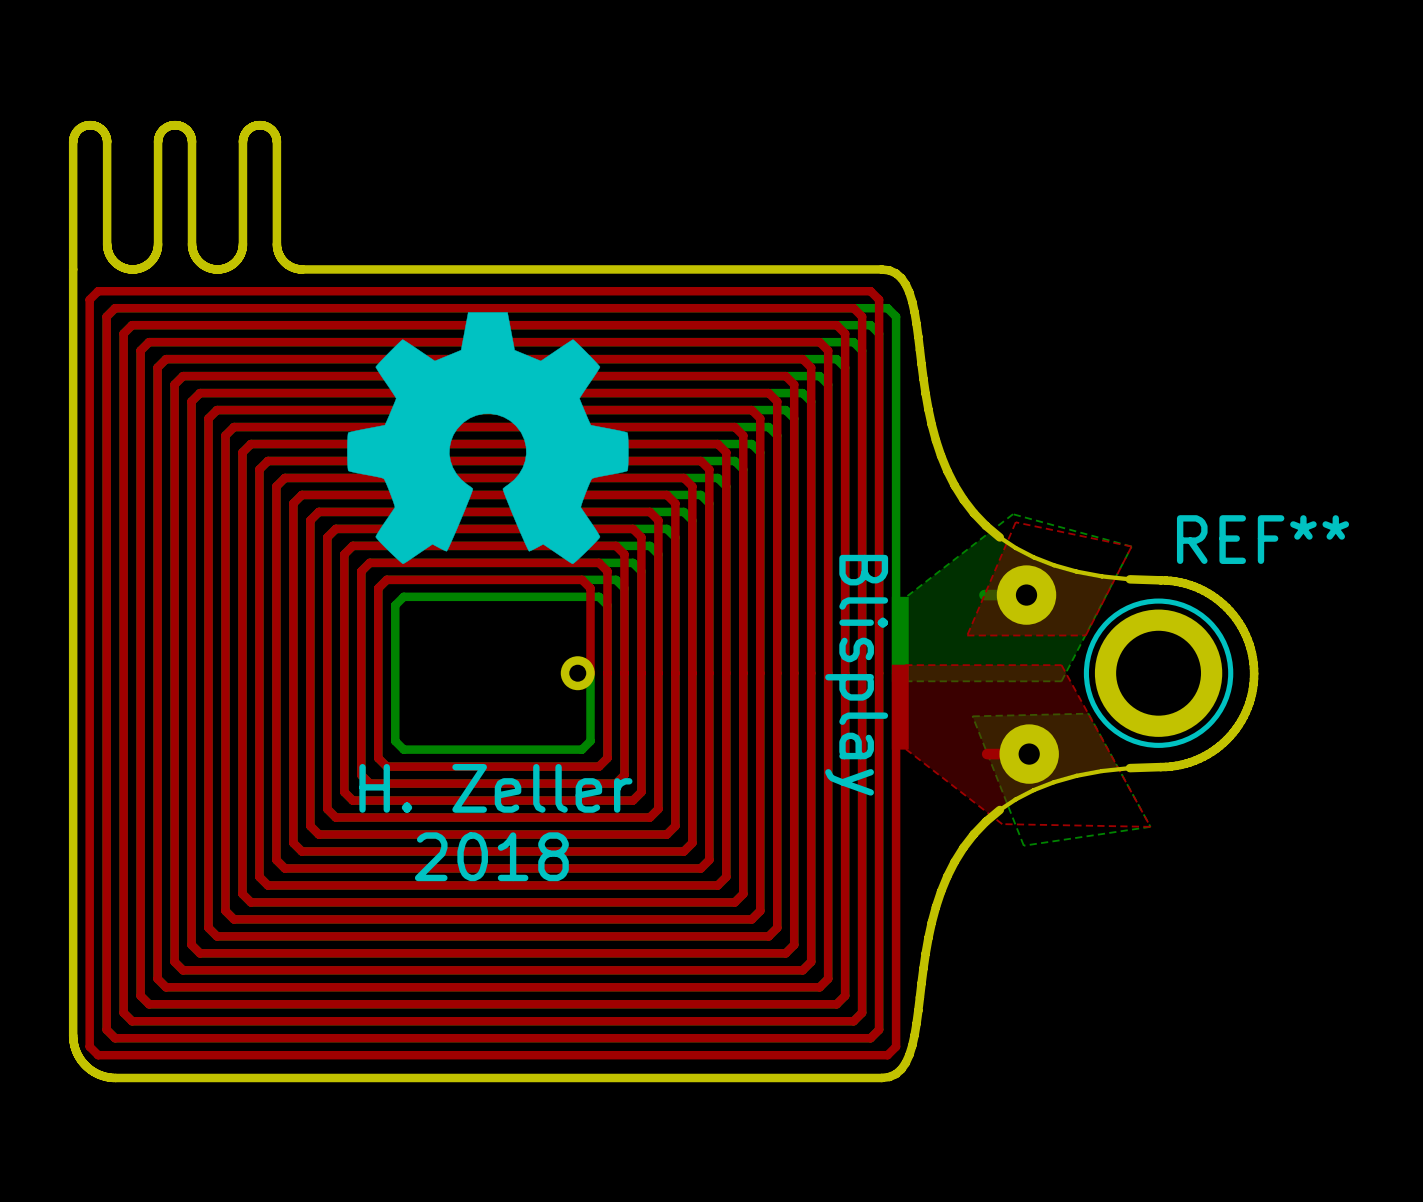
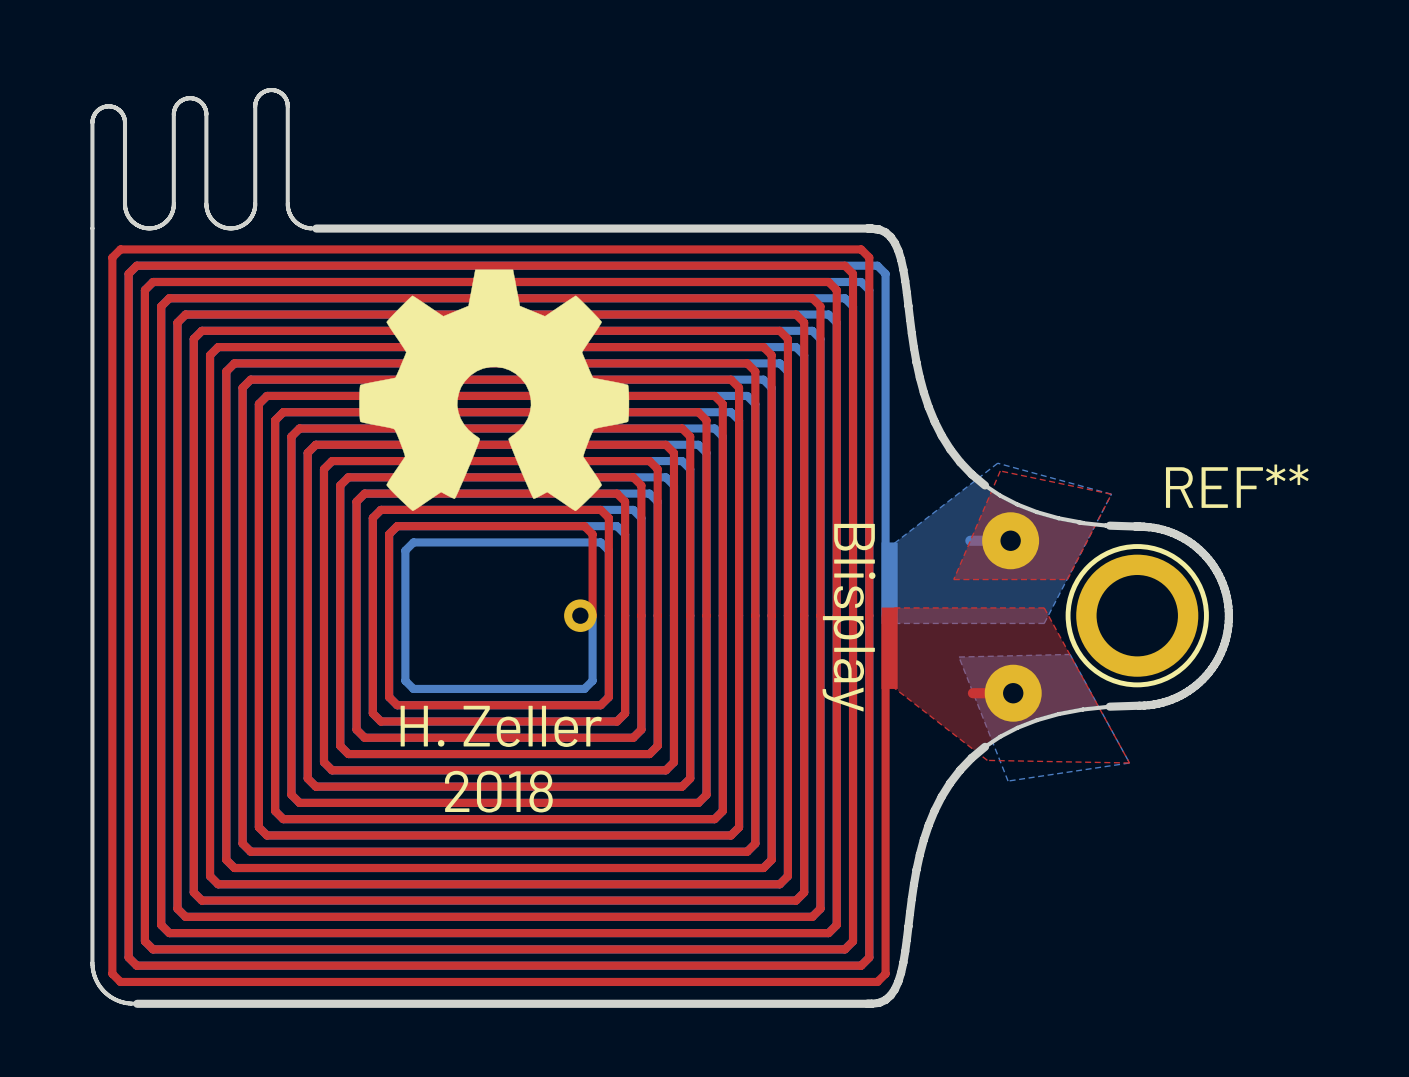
board edge: none -> (312, 228) (296, 222) (288, 209) (287, 105) (285, 97) (278, 91) (265, 91) (259, 95) (256, 101) (254, 207) (247, 222) (233, 228) (217, 224) (211, 218) (207, 210) (206, 113) (200, 101) (193, 98) (185, 98) (179, 102) (174, 108) (173, 207) (165, 222) (152, 228) (136, 224) (129, 218) (125, 210) (124, 121) (123, 115) (116, 108) (108, 106) (100, 108) (94, 115) (92, 122) (92, 965) (96, 979) (105, 993) (118, 1000) (133, 1003)
board edge: (302, 269) (286, 263) (277, 249) (276, 141) (274, 133) (268, 127) (260, 125) (253, 126) (247, 130) (243, 136) (242, 248) (234, 262) (218, 269) (202, 264) (196, 257) (192, 249) (191, 141) (186, 129) (179, 125) (171, 125) (164, 128) (159, 135) (157, 248) (149, 262) (133, 269) (117, 264) (111, 257) (107, 249) (105, 135) (99, 127) (91, 125) (82, 127) (75, 133) (73, 142) (73, 1037) (76, 1053) (87, 1067) (100, 1075) (115, 1077) -> none

